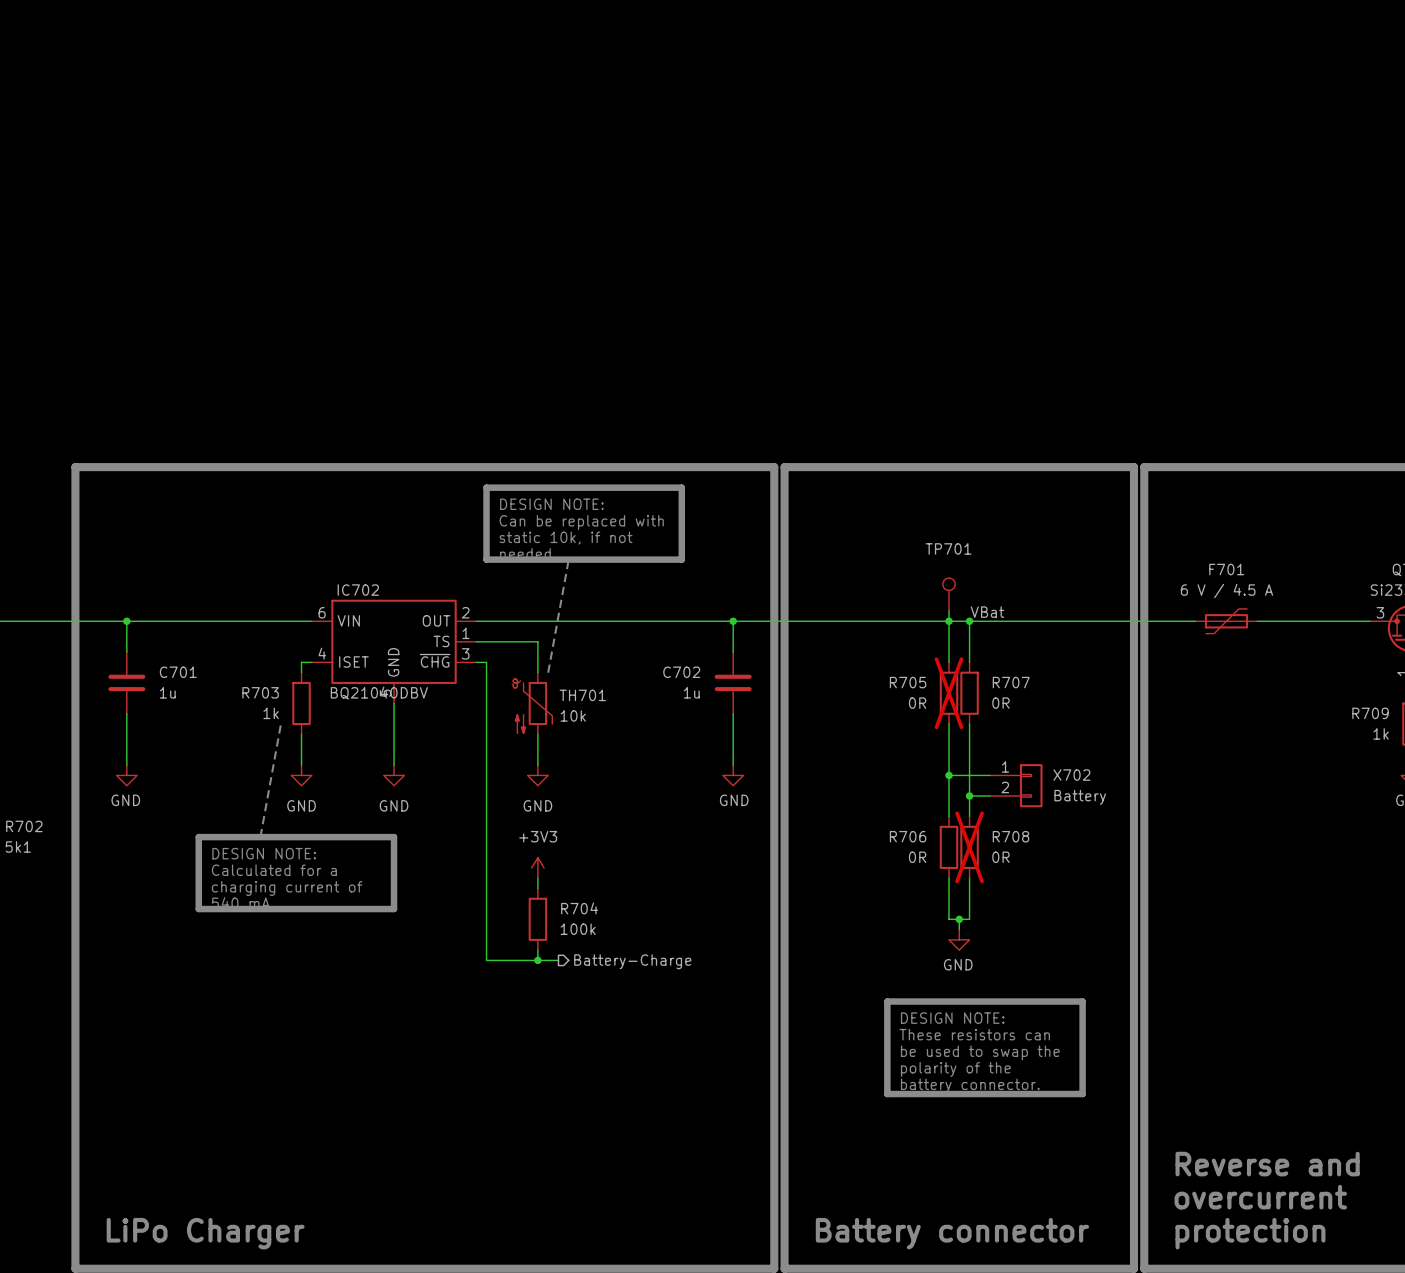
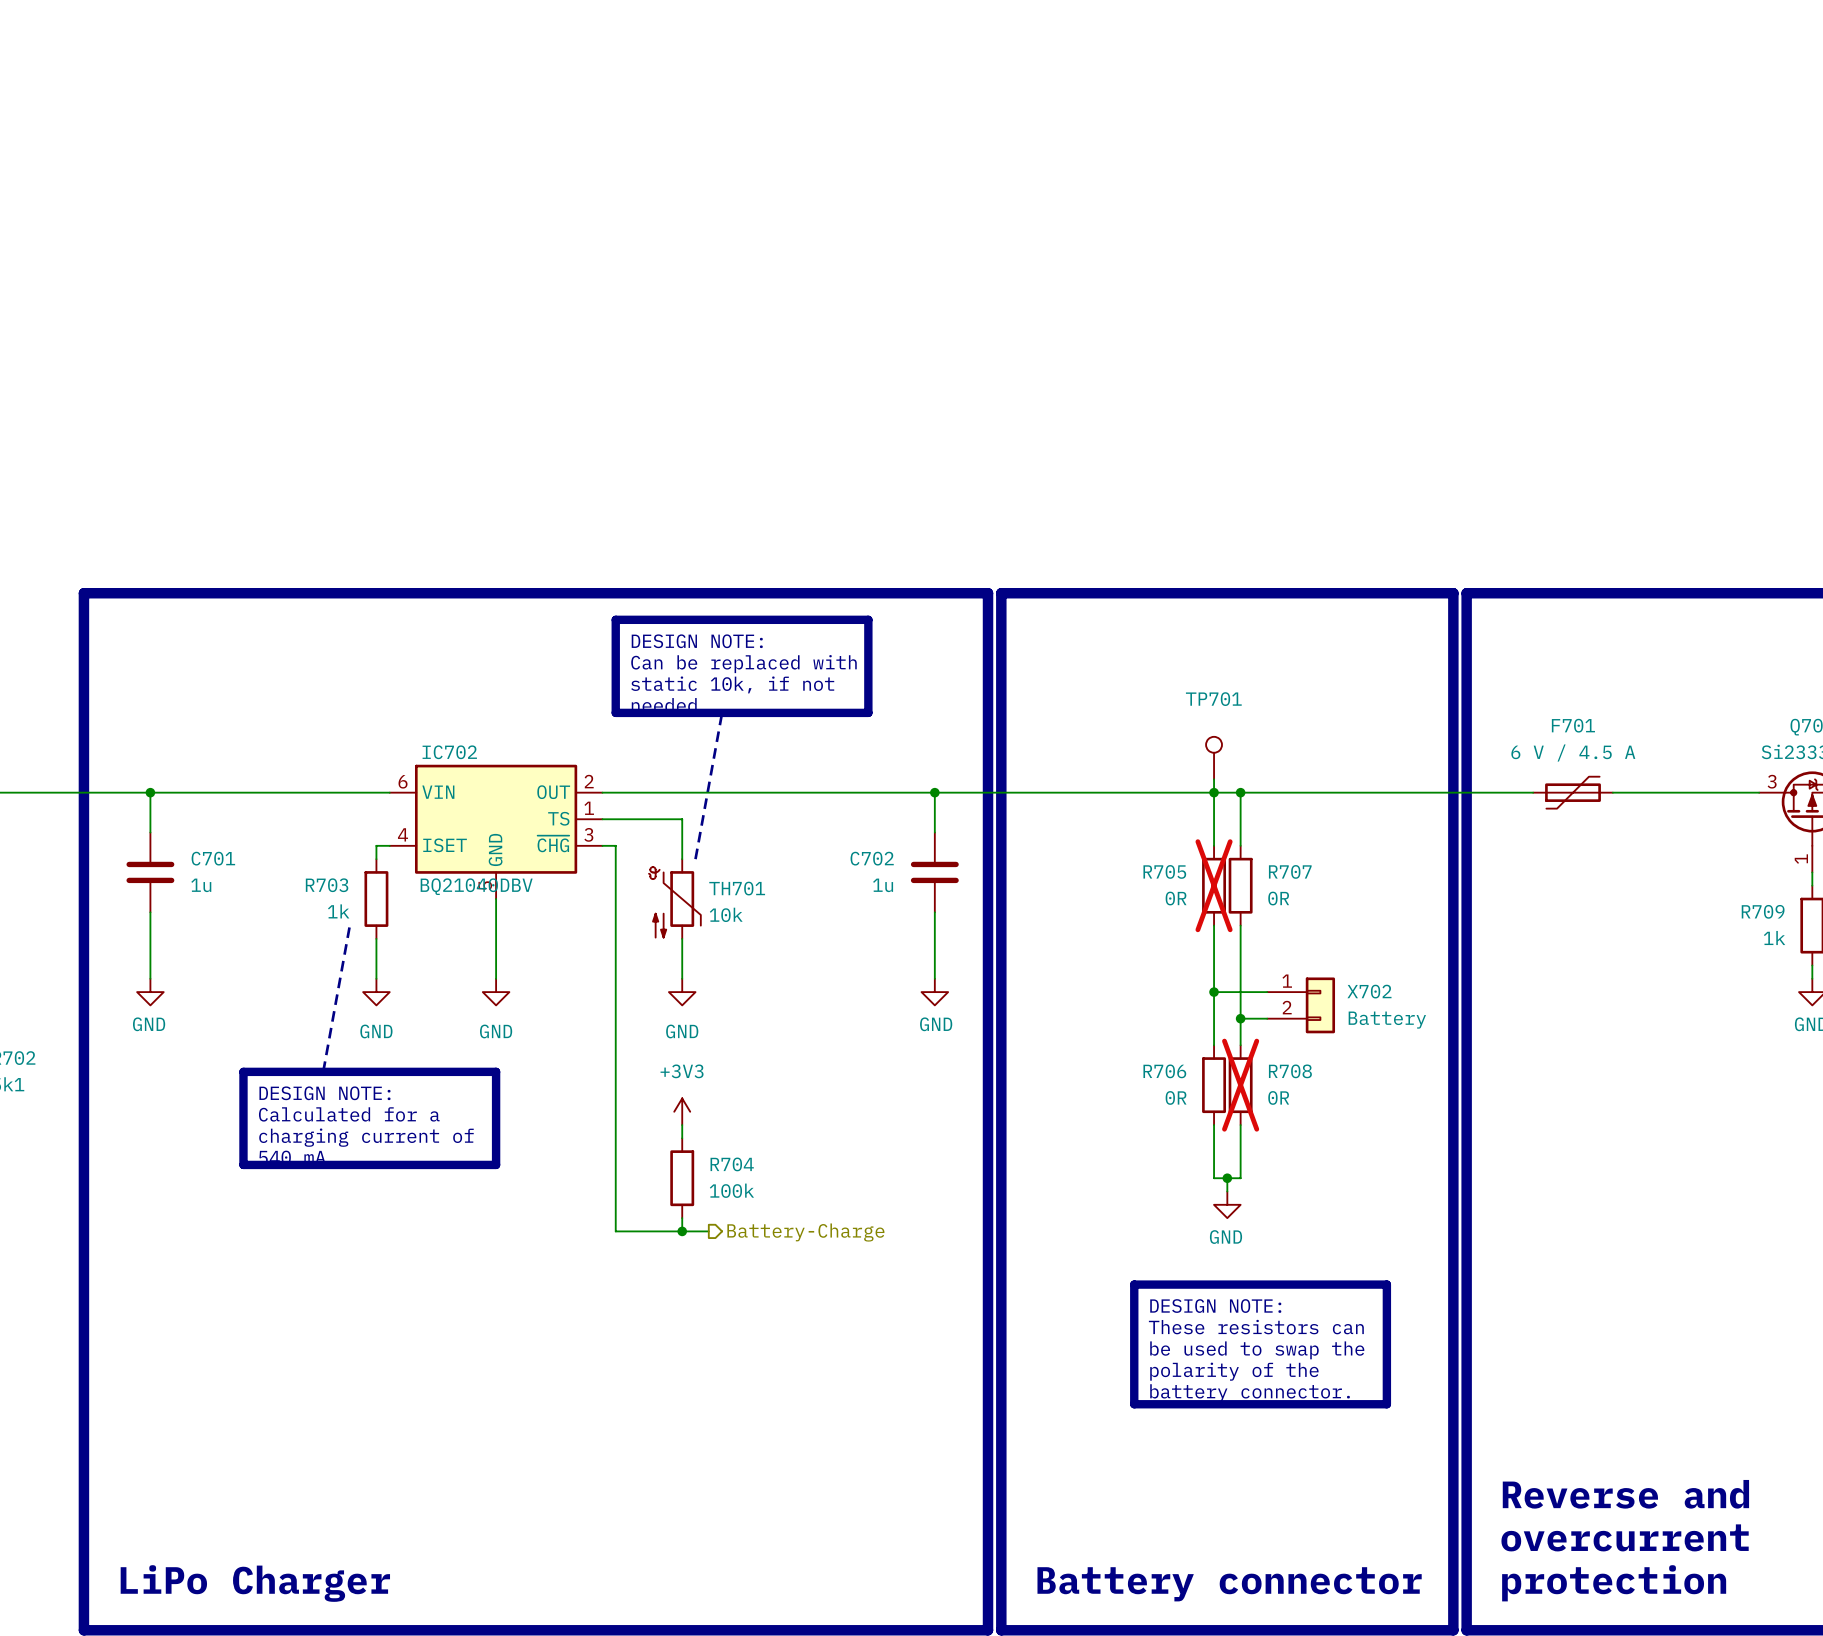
label: VBat (987, 612) -> none

